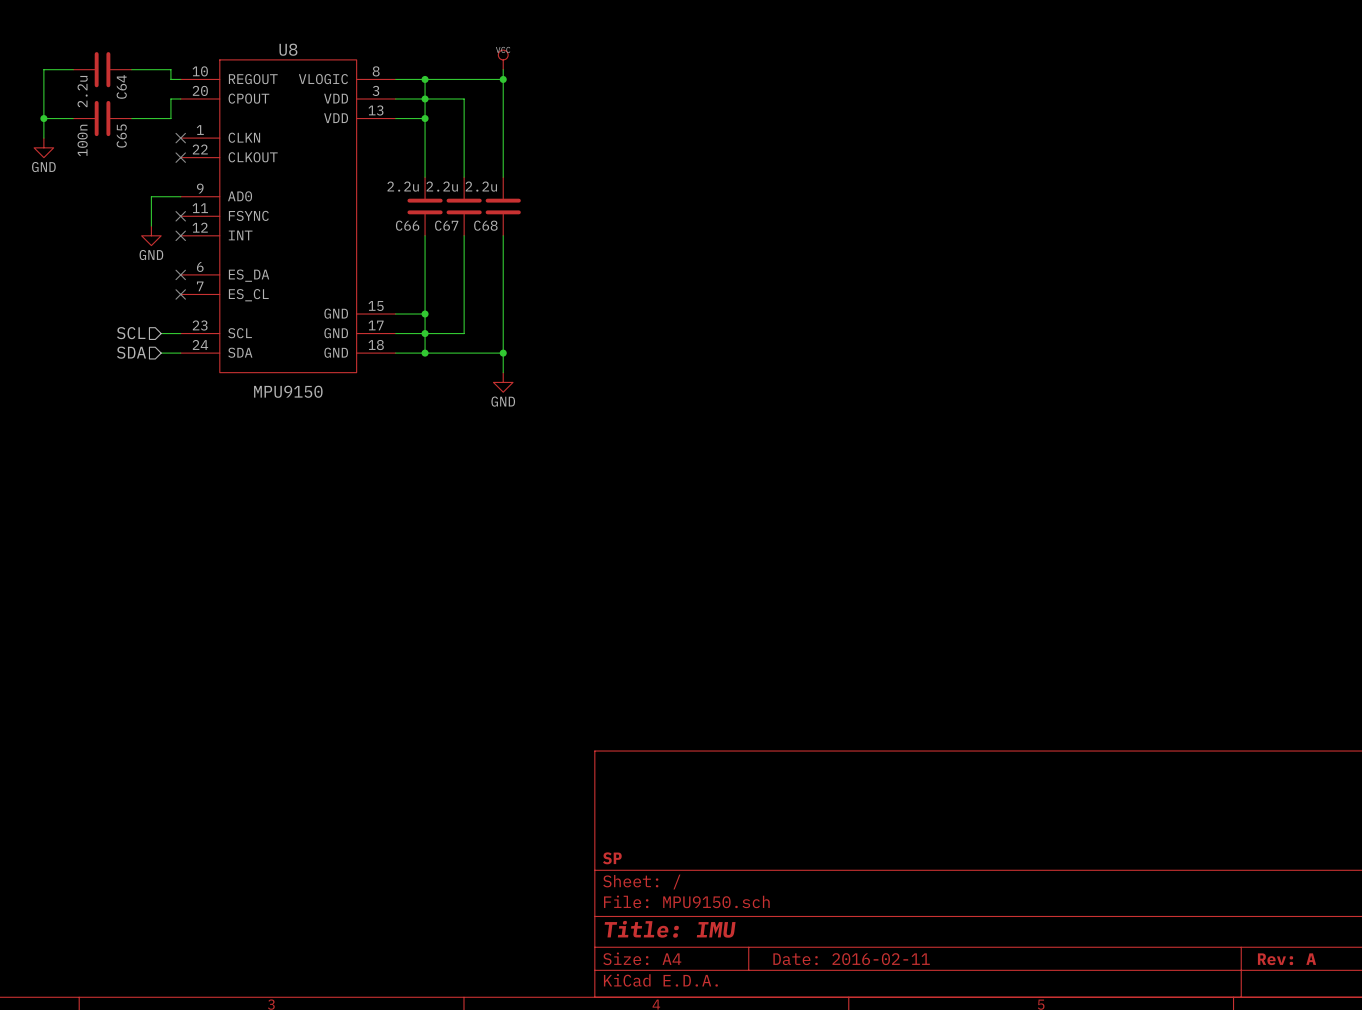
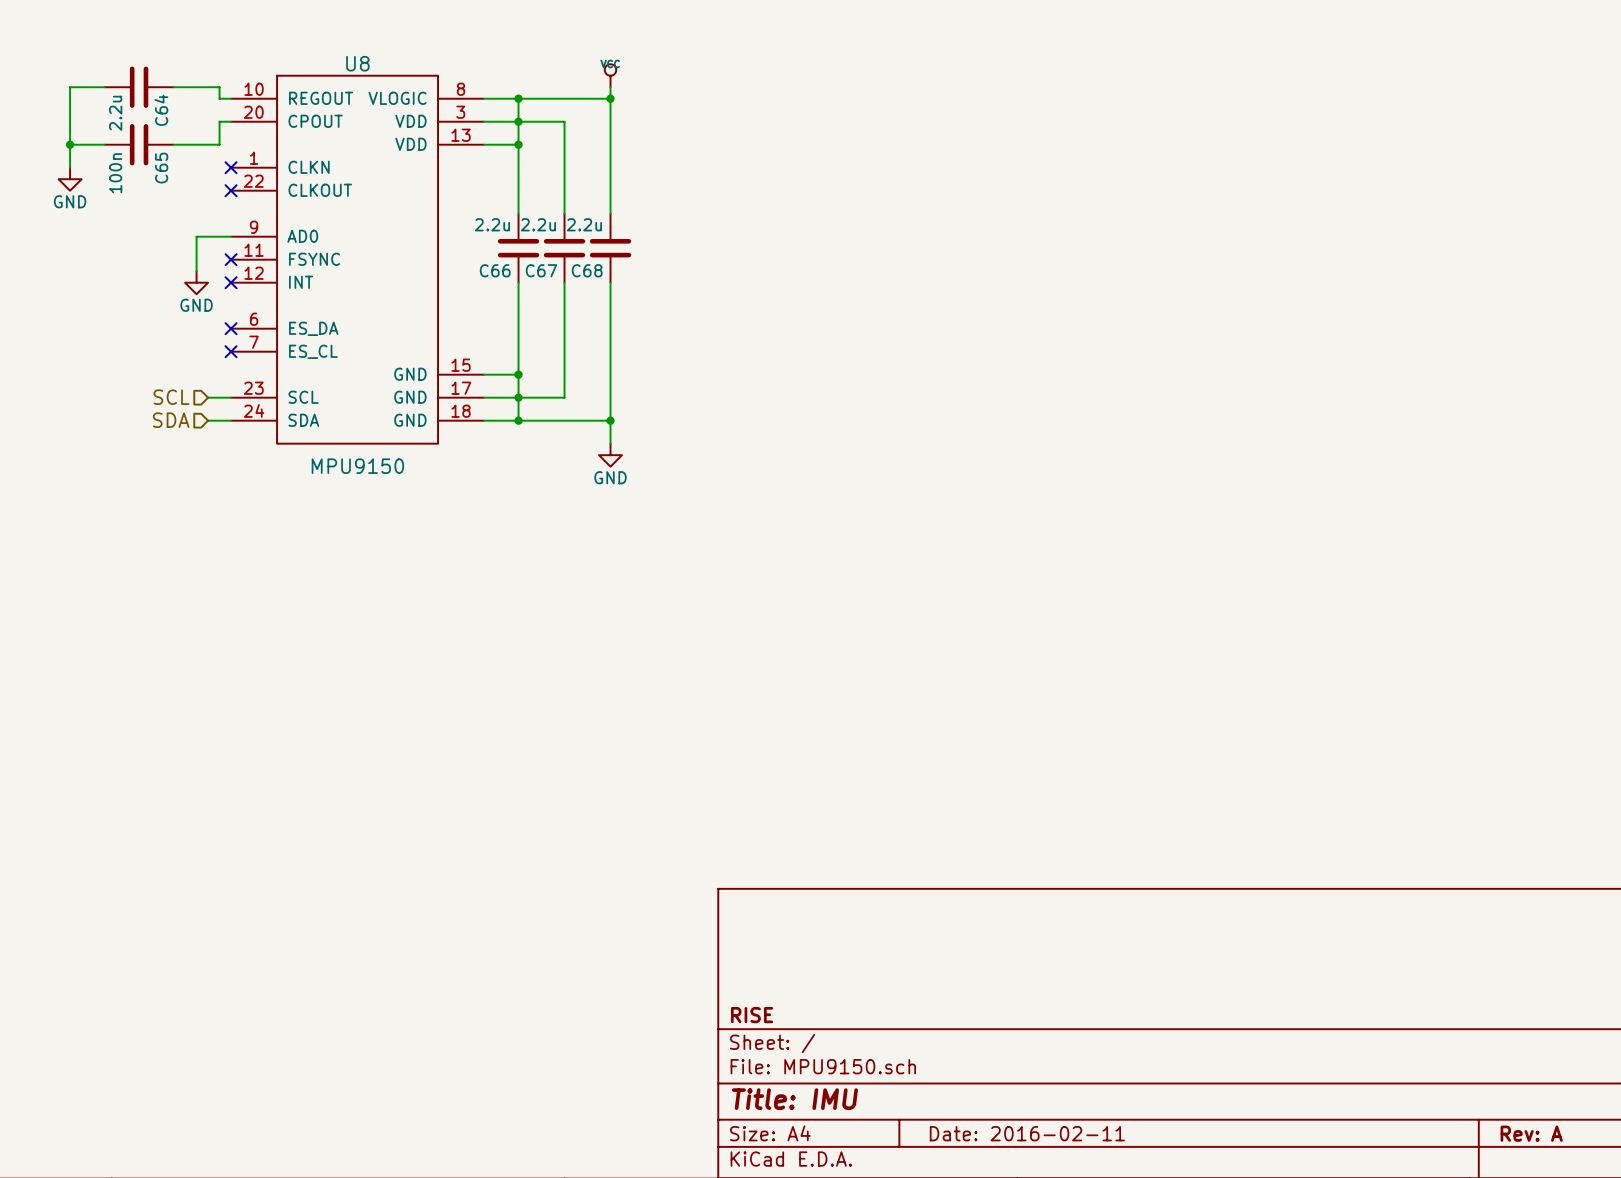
title block: SP (612, 858) -> RISE (752, 1015)

